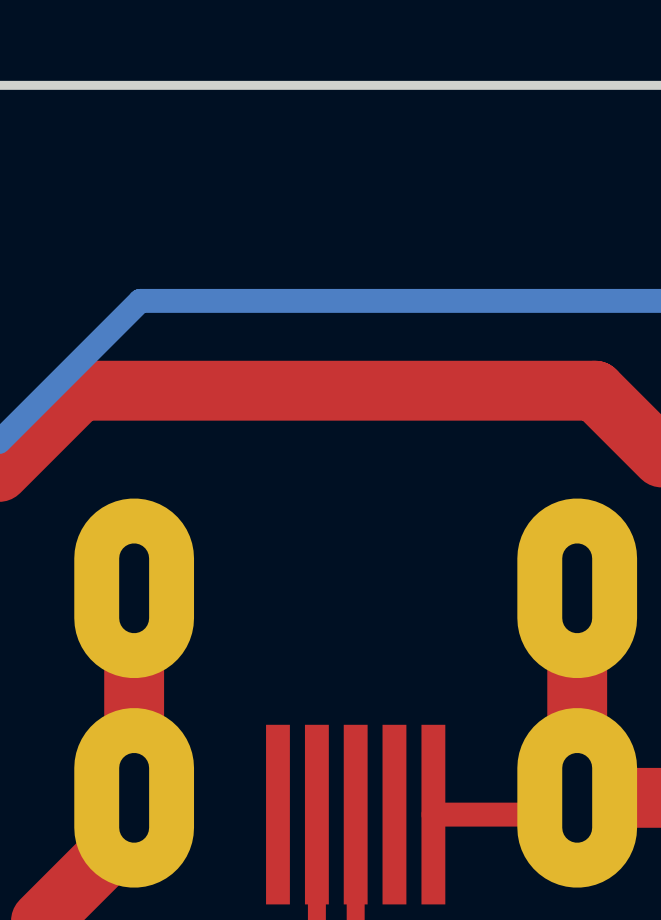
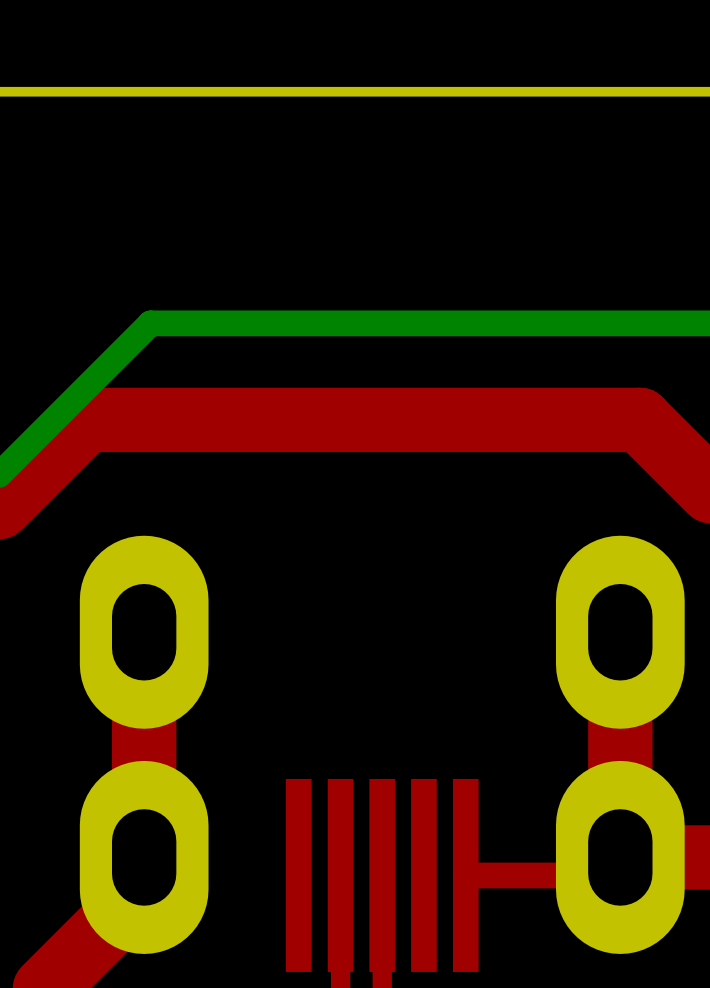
part footprint: [74, 498, 638, 905] -> [79, 535, 685, 972]

